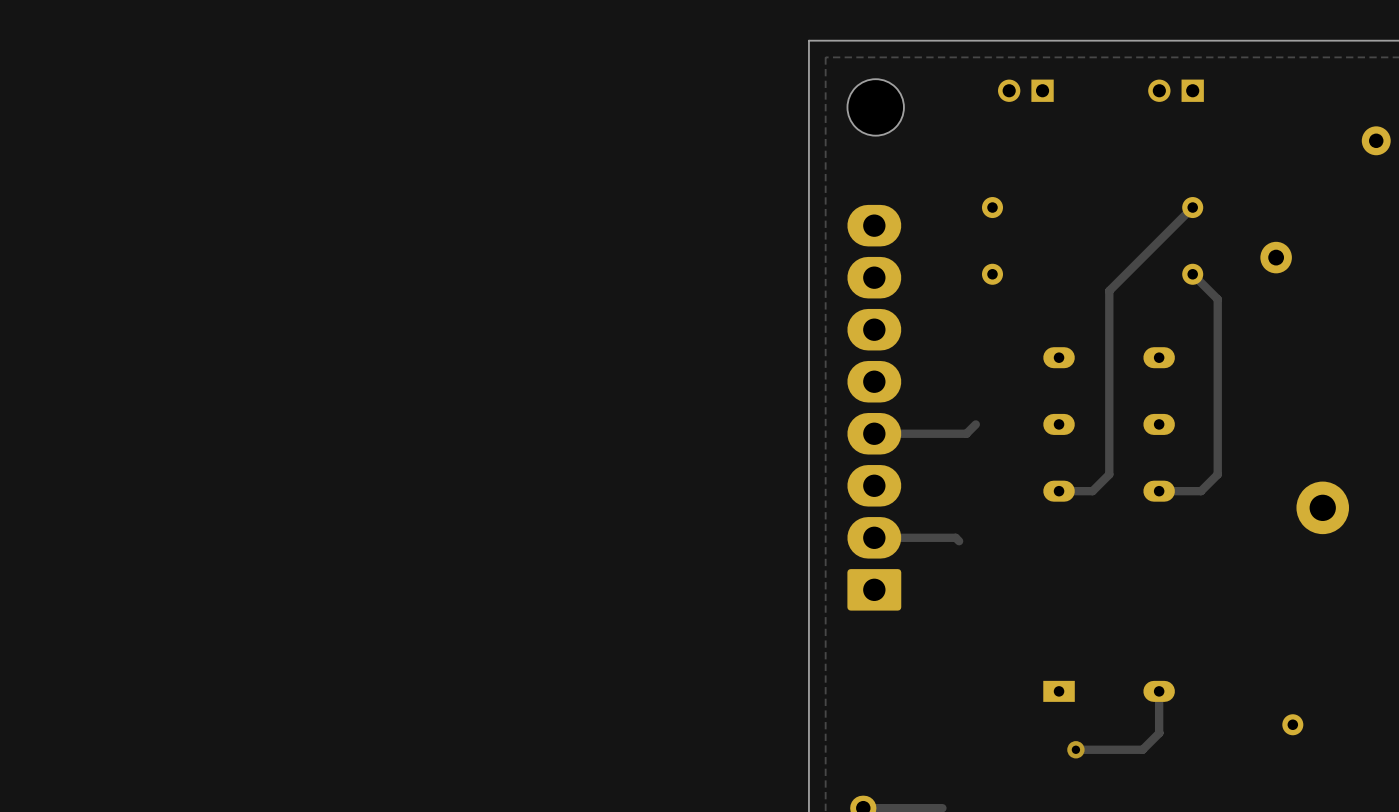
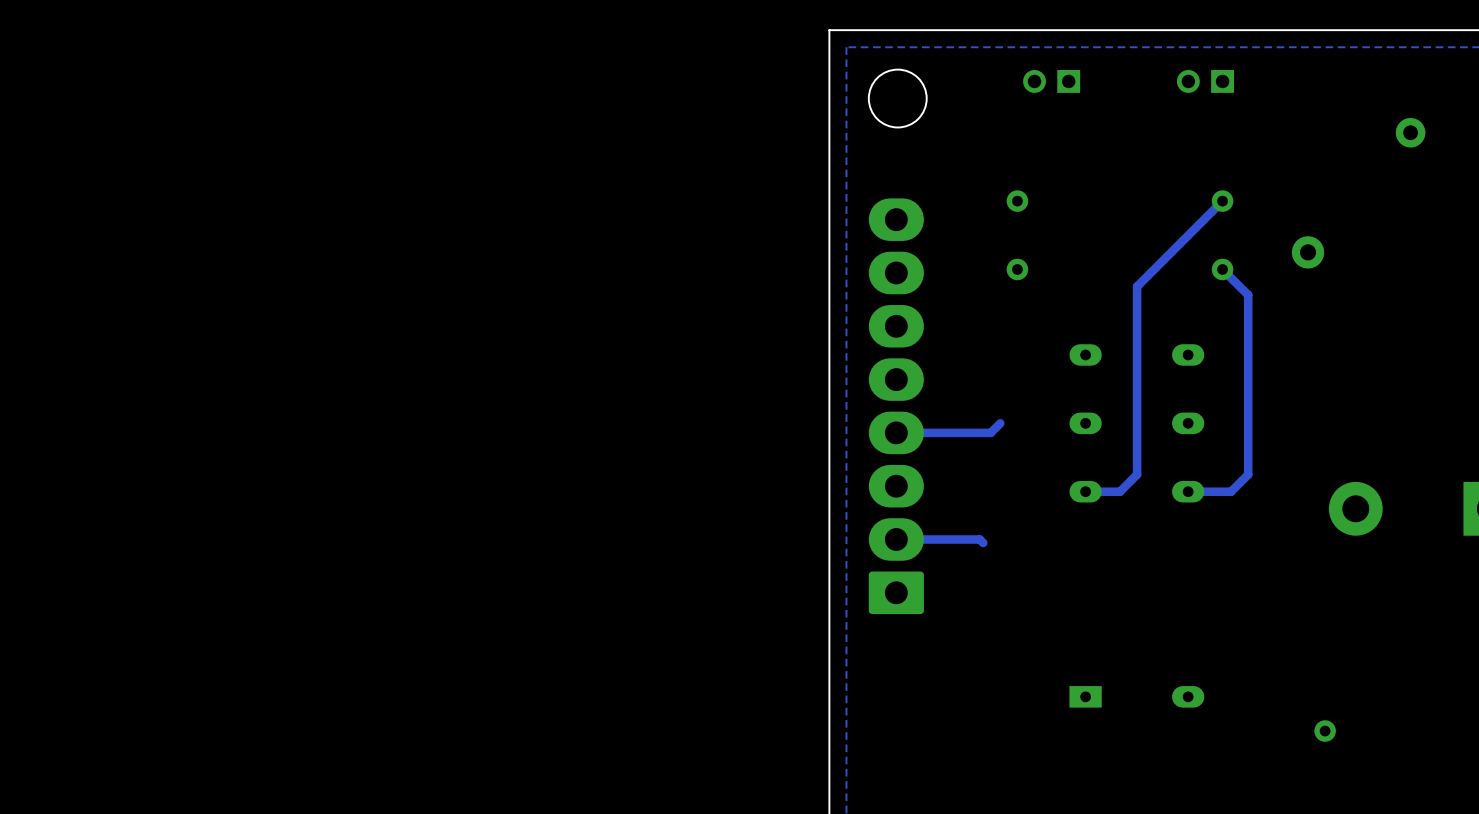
track: (1159, 691) (1159, 733) (1142, 749) (1075, 749) -> none
via: (1075, 749) -> none

